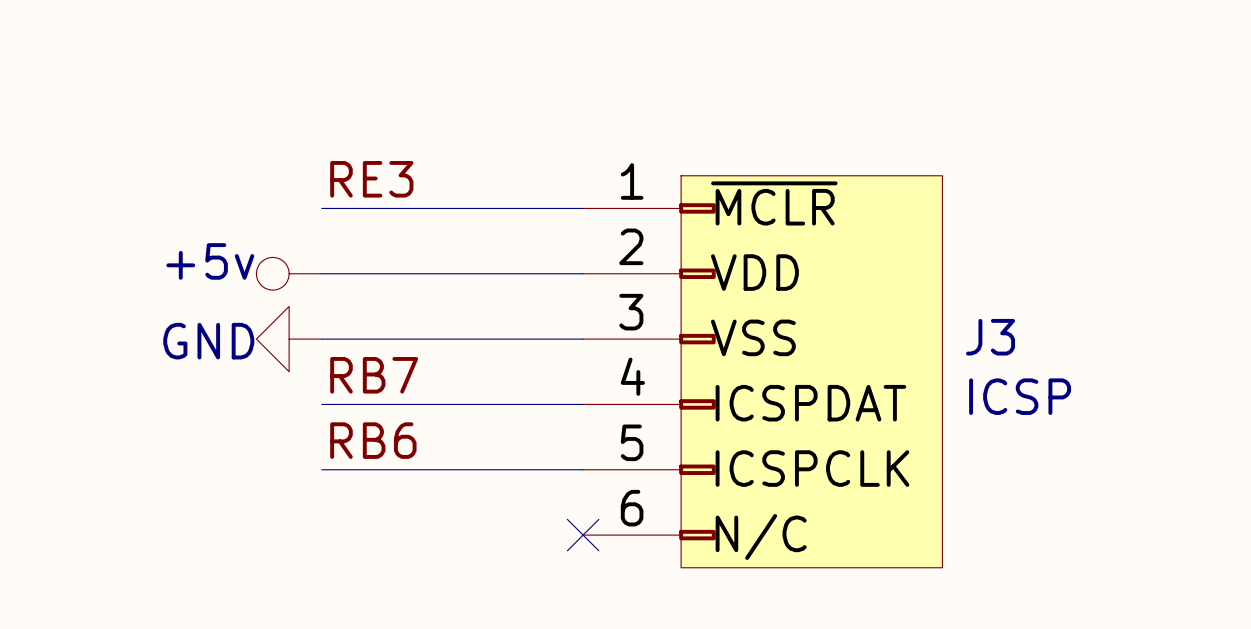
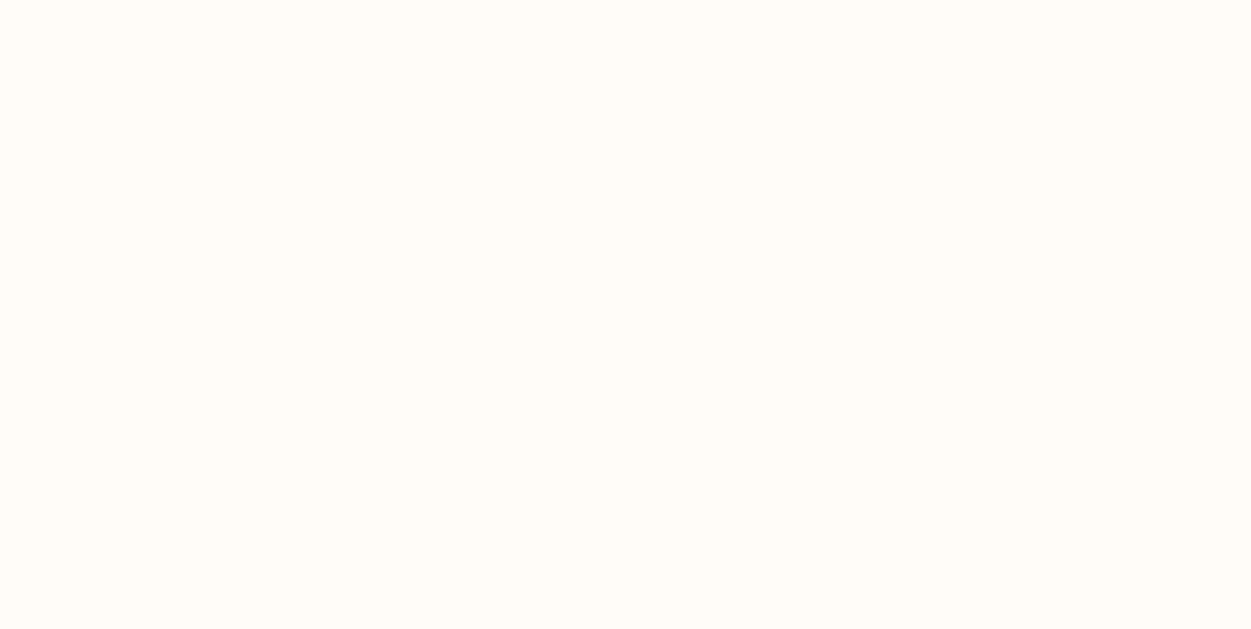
label: RE3 (371, 179) -> none
wire: (321, 208) (583, 208) -> none
power symbol: +5v (289, 273) -> none
wire: (321, 273) (583, 273) -> none
power symbol: GND (289, 339) -> none
wire: (321, 339) (583, 339) -> none
J3: ICSP (762, 371) -> none
label: RB7 (374, 375) -> none
wire: (321, 404) (583, 404) -> none
label: RB6 (373, 440) -> none
wire: (321, 469) (583, 469) -> none
no-connect mark: (583, 535) -> none

